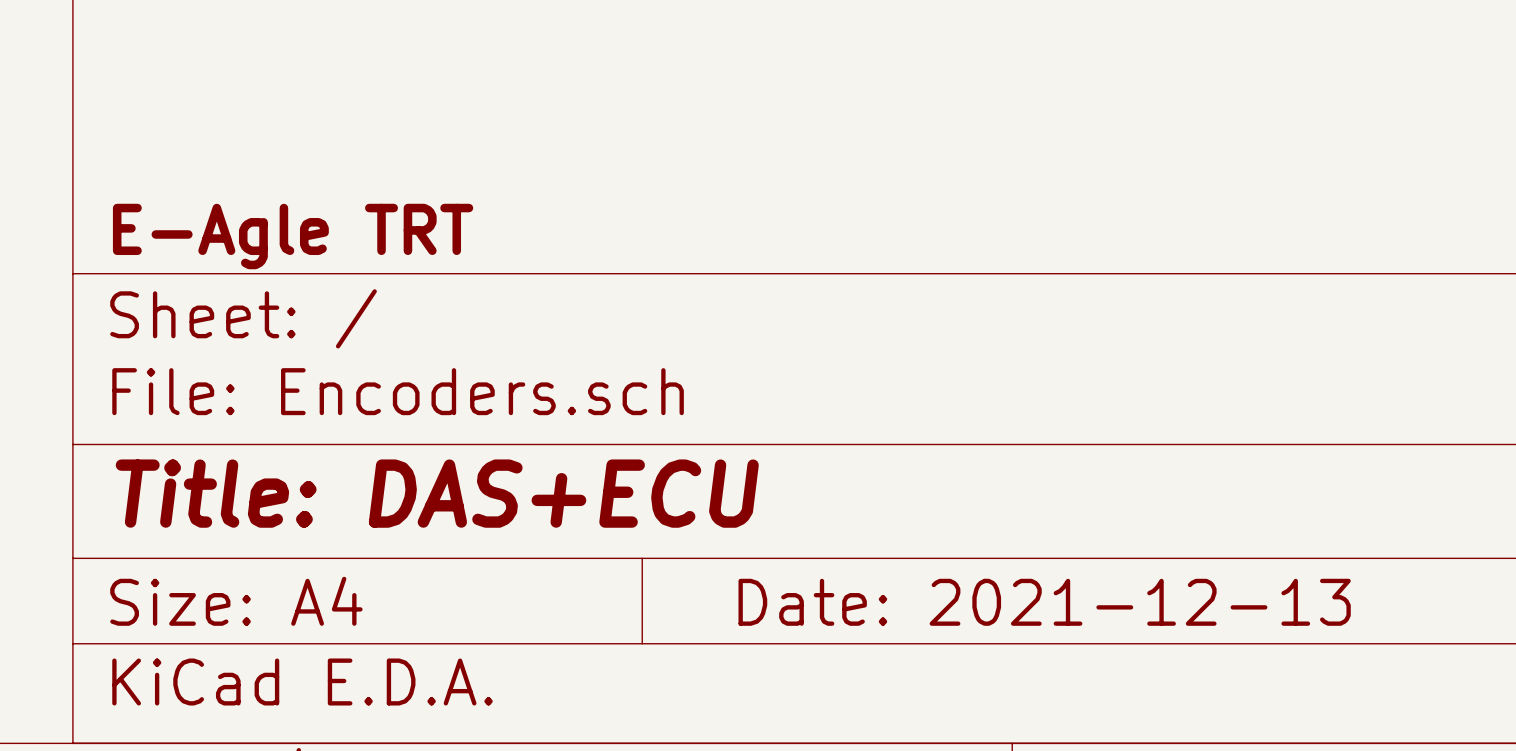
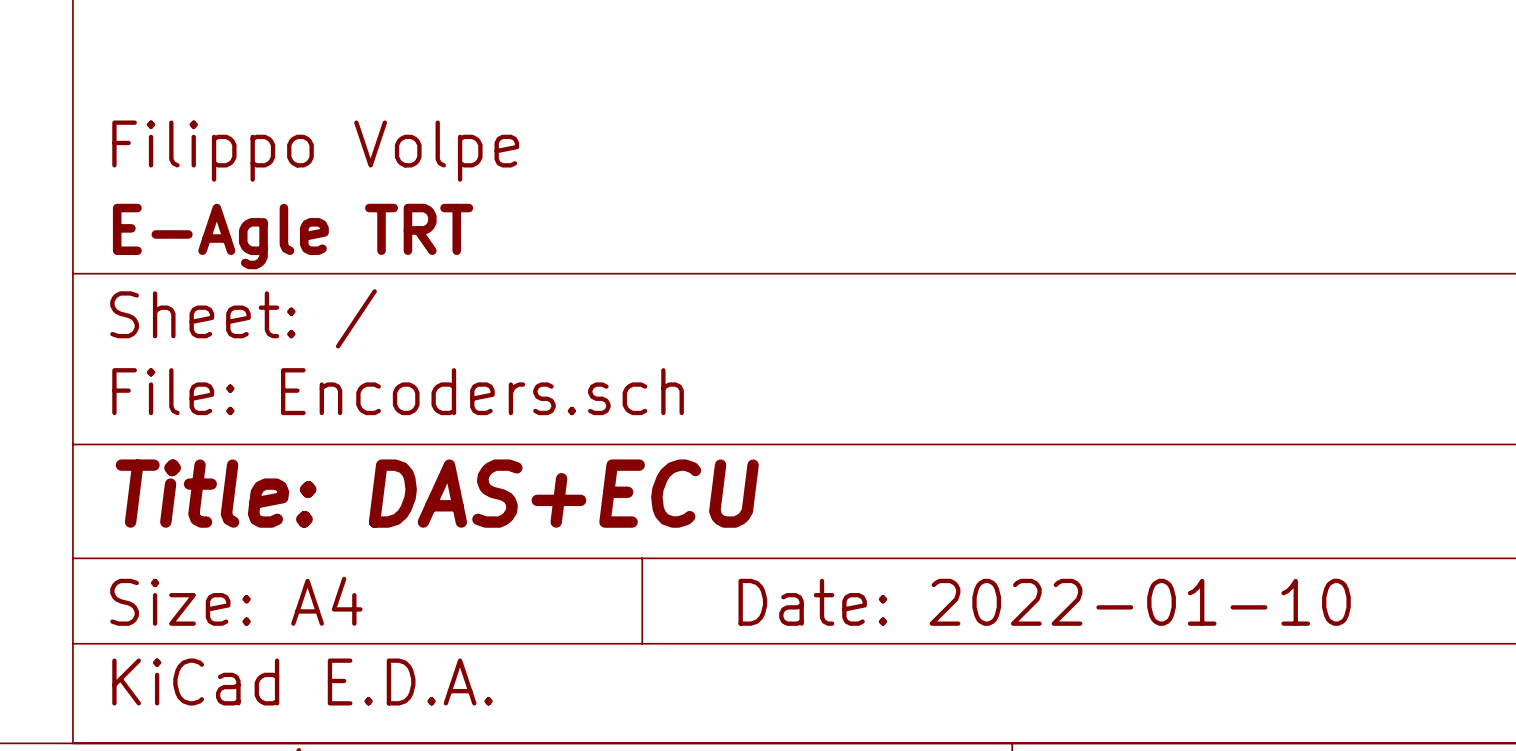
title block: none -> Filippo Volpe (315, 151)
title block: Date: 2021-12-13 (1044, 602) -> Date: 2022-01-10 (1044, 602)

